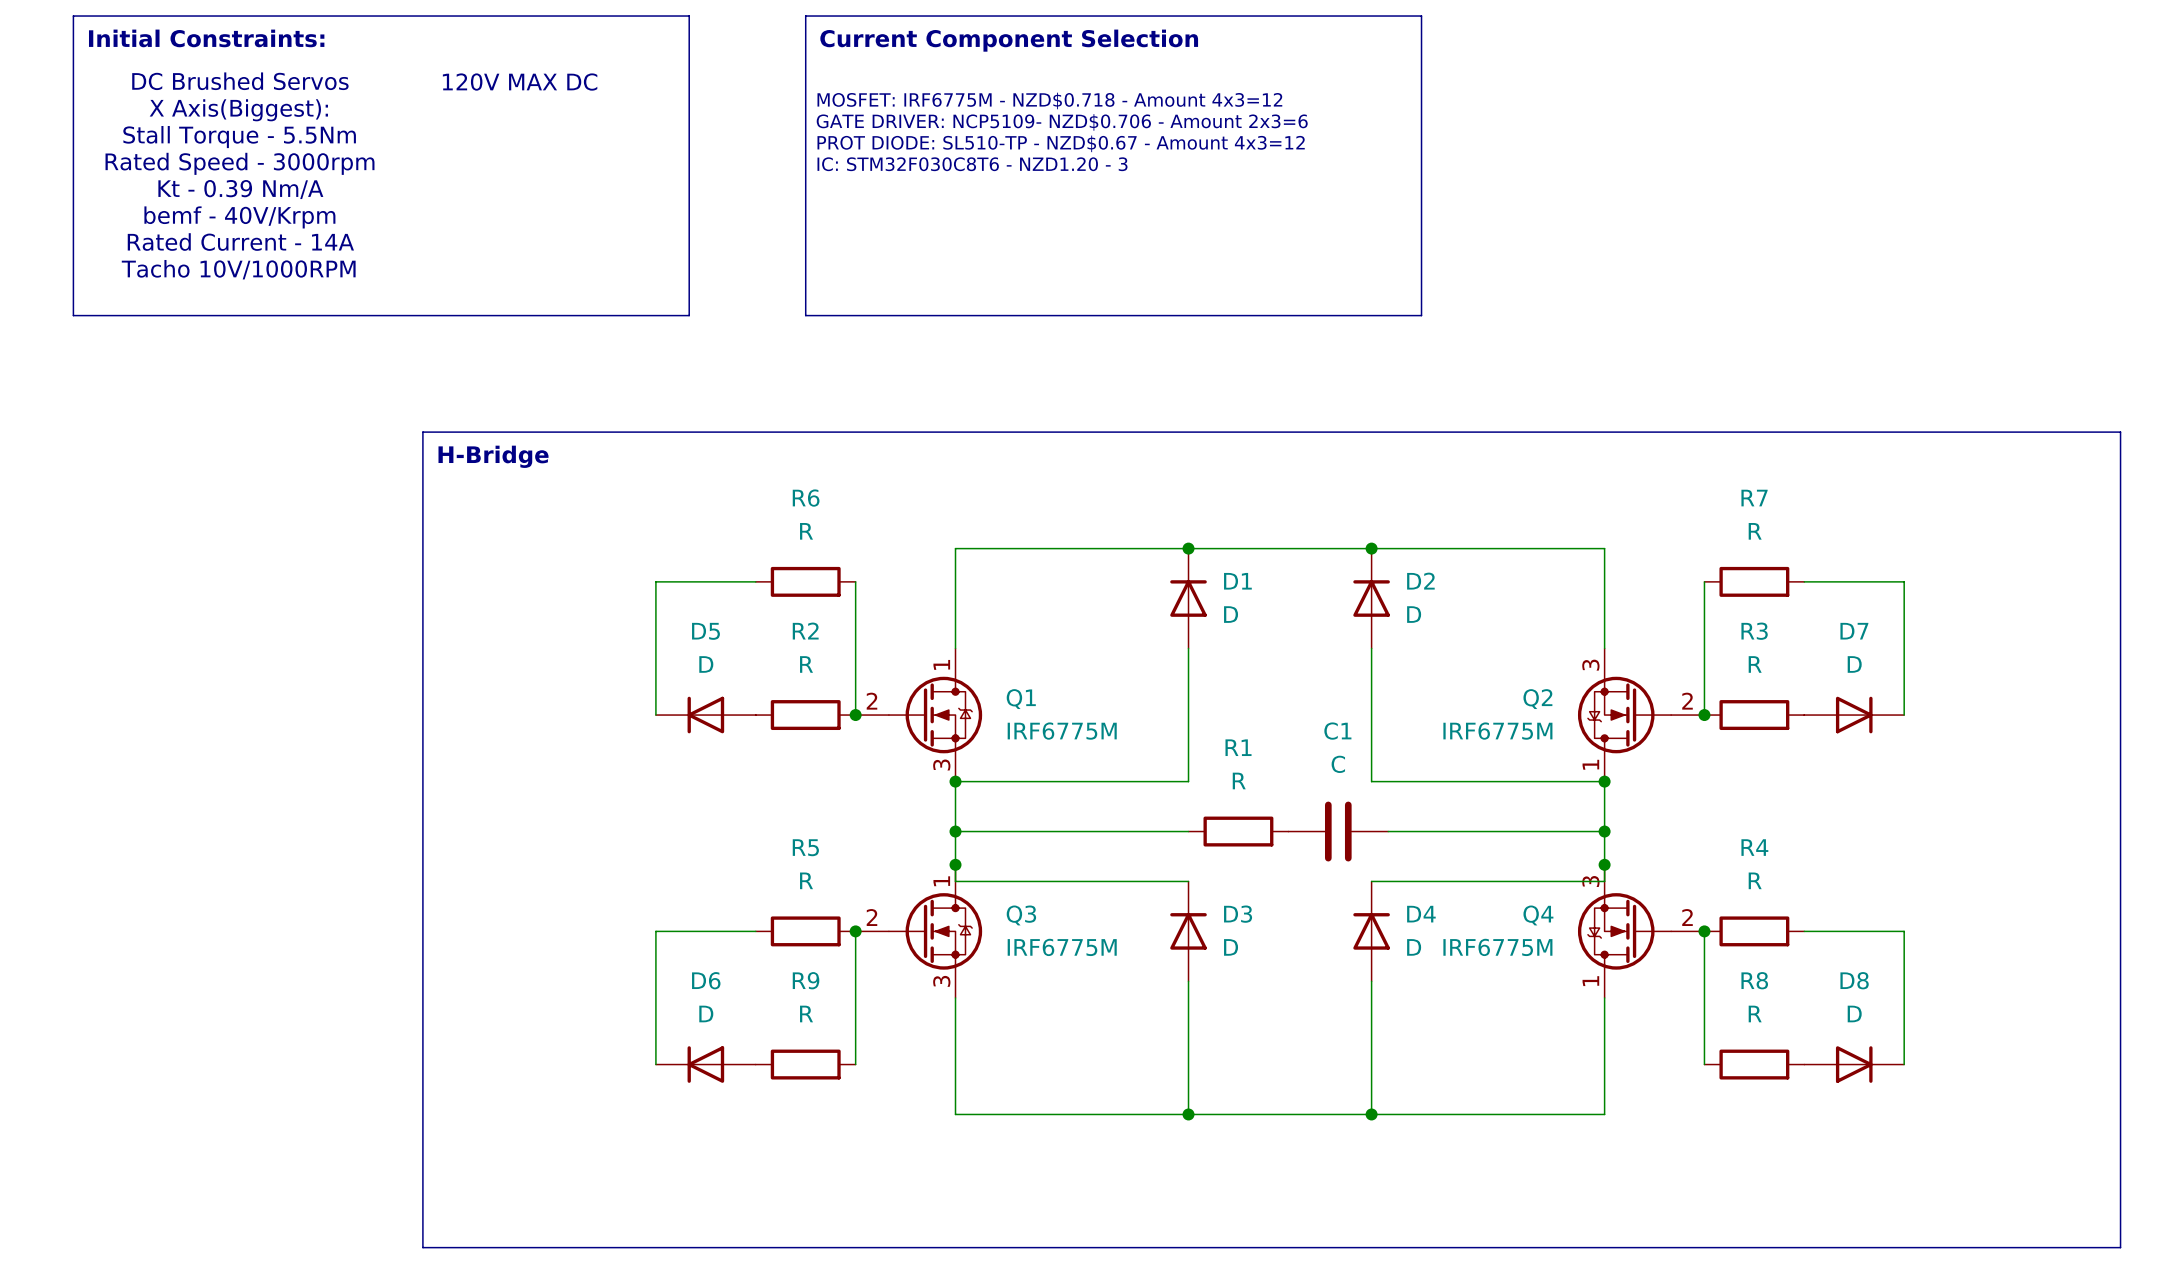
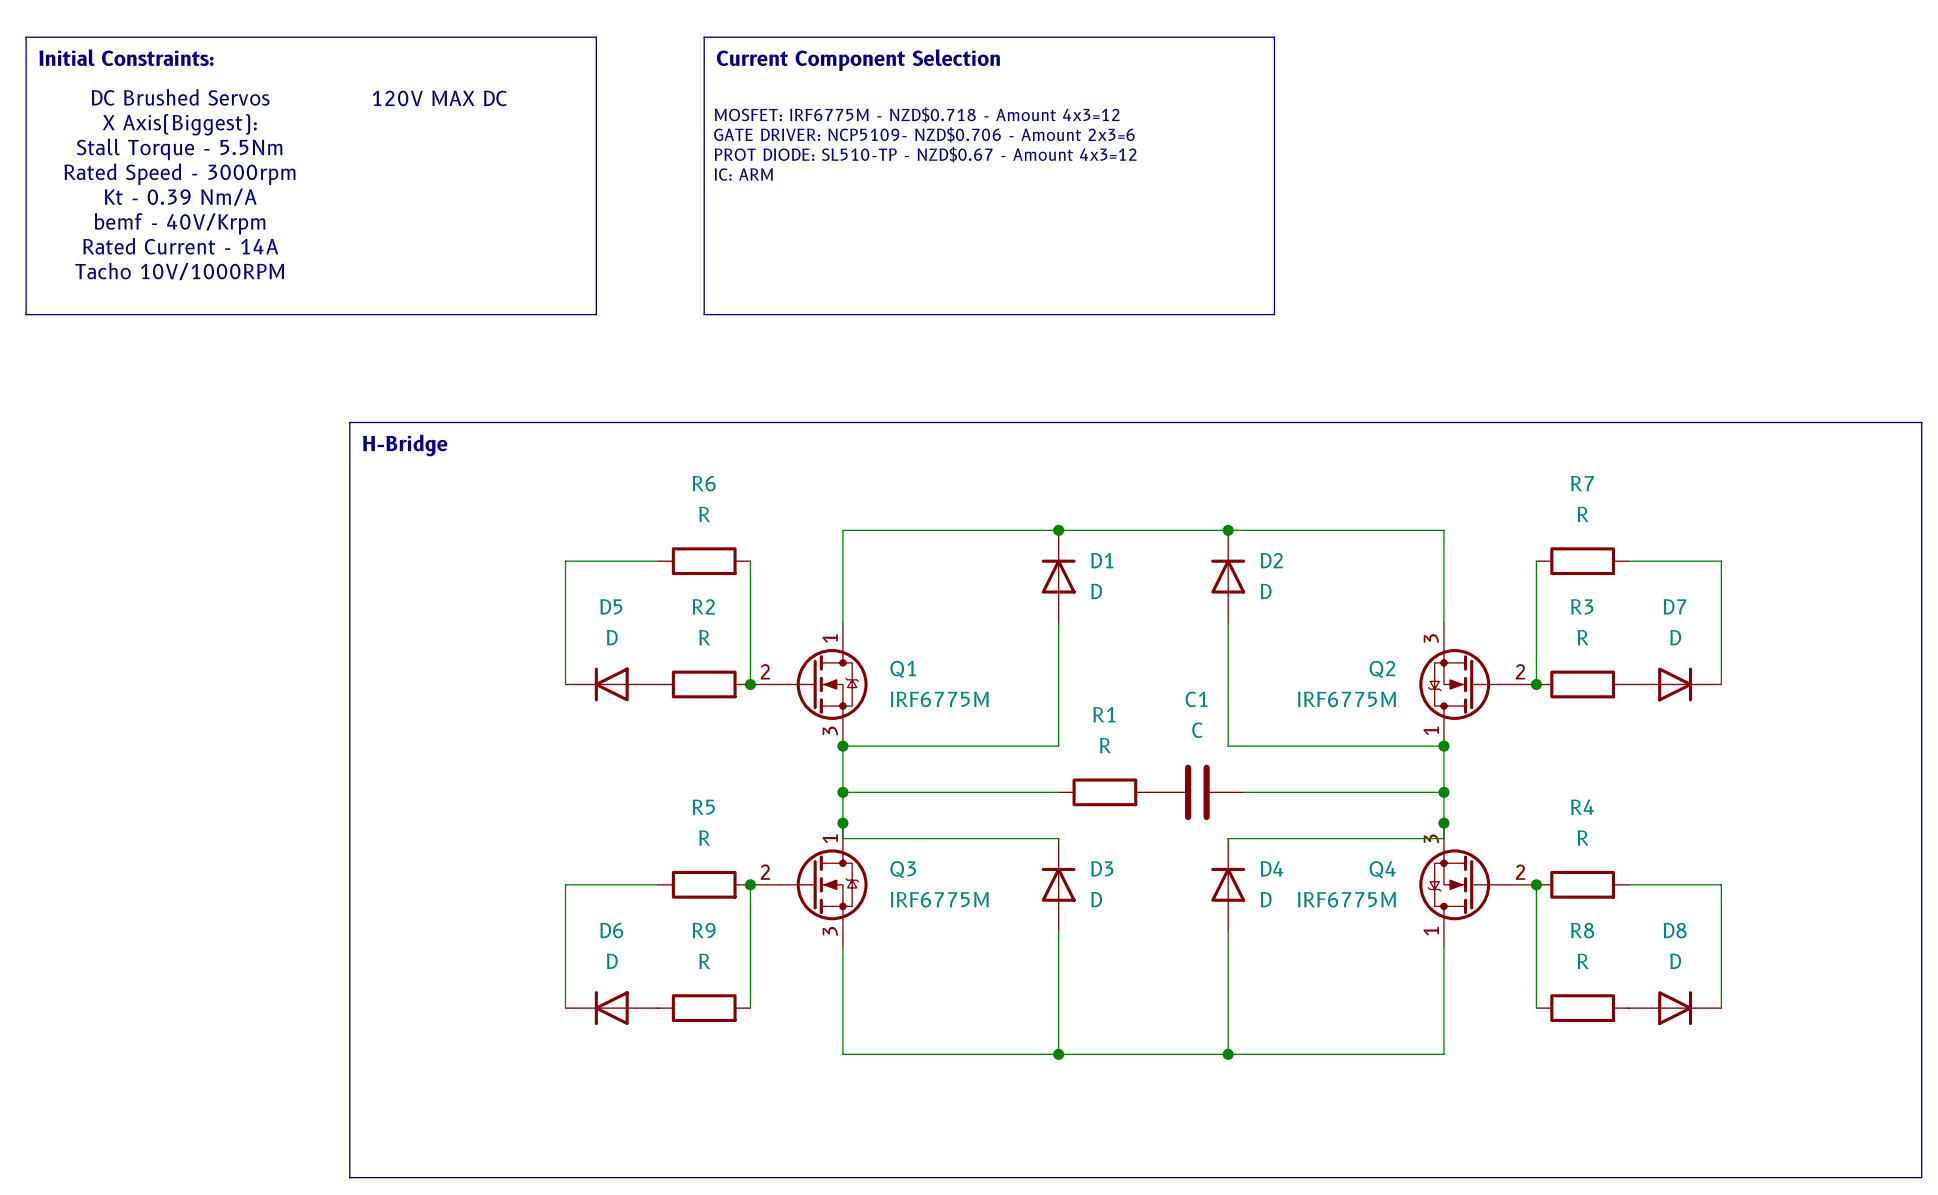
text: IC: STM32F030C8T6 - NZD1.20 - 3 (972, 164) -> IC: ARM (743, 174)

